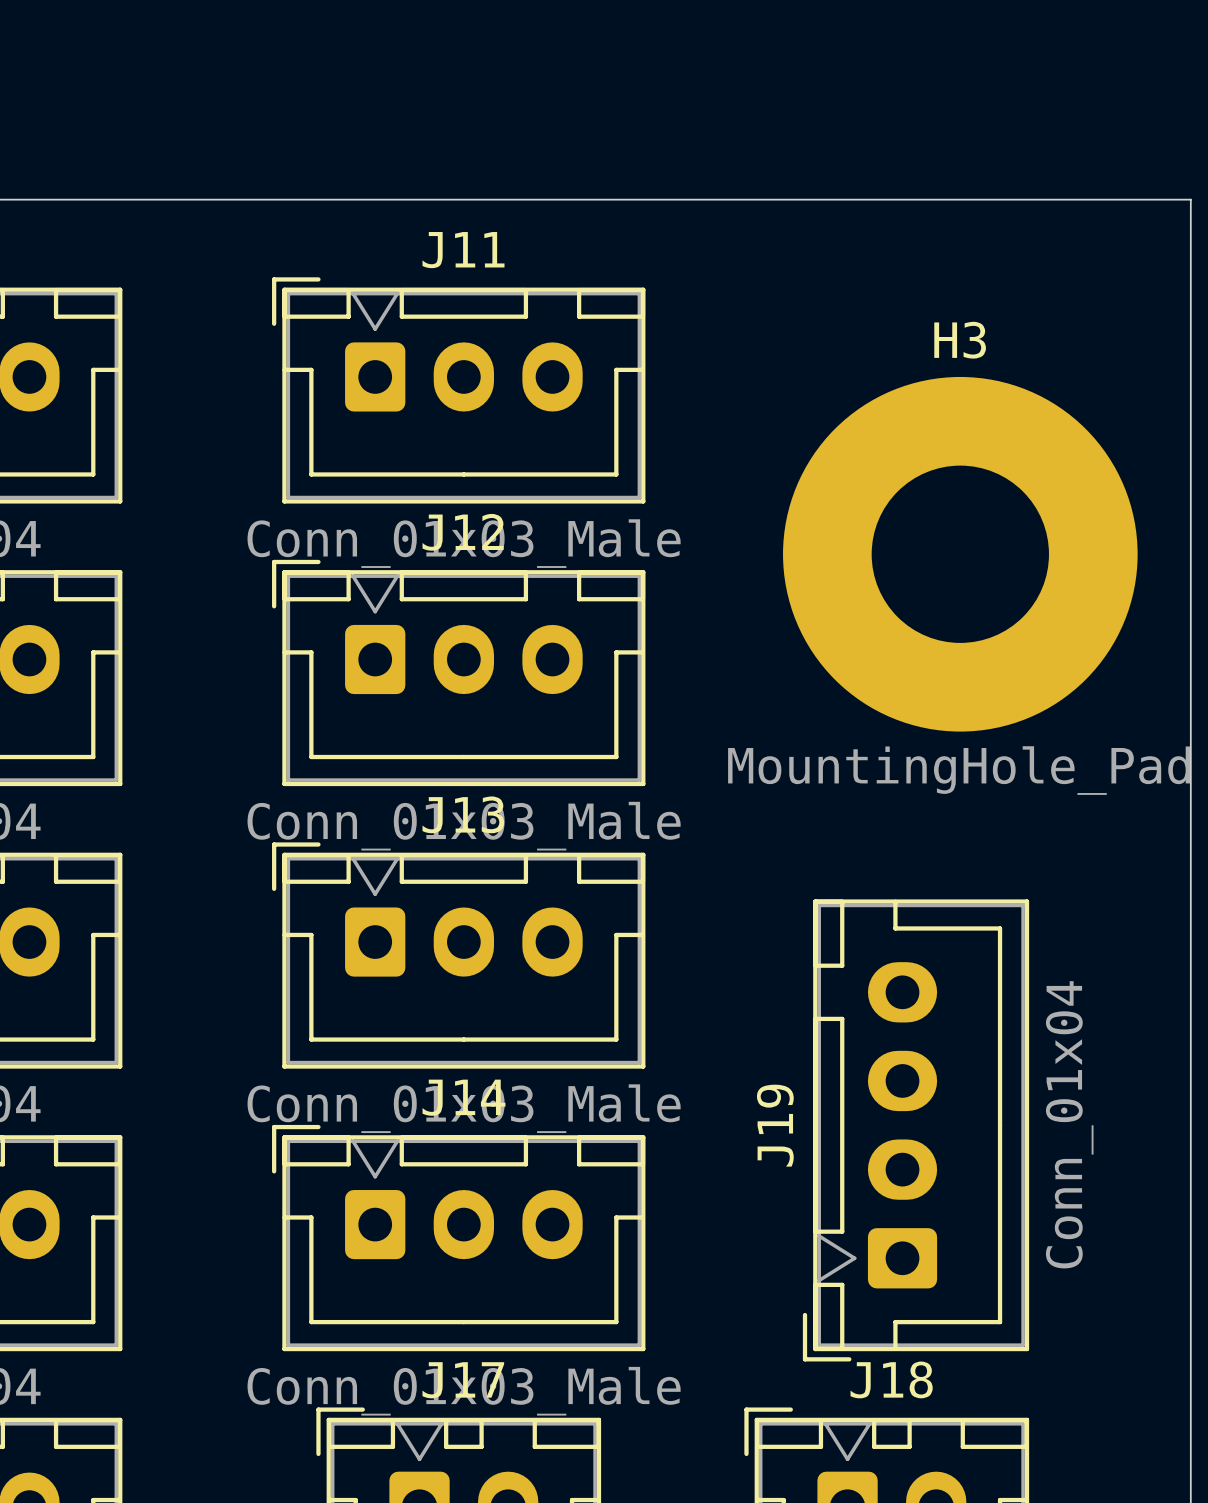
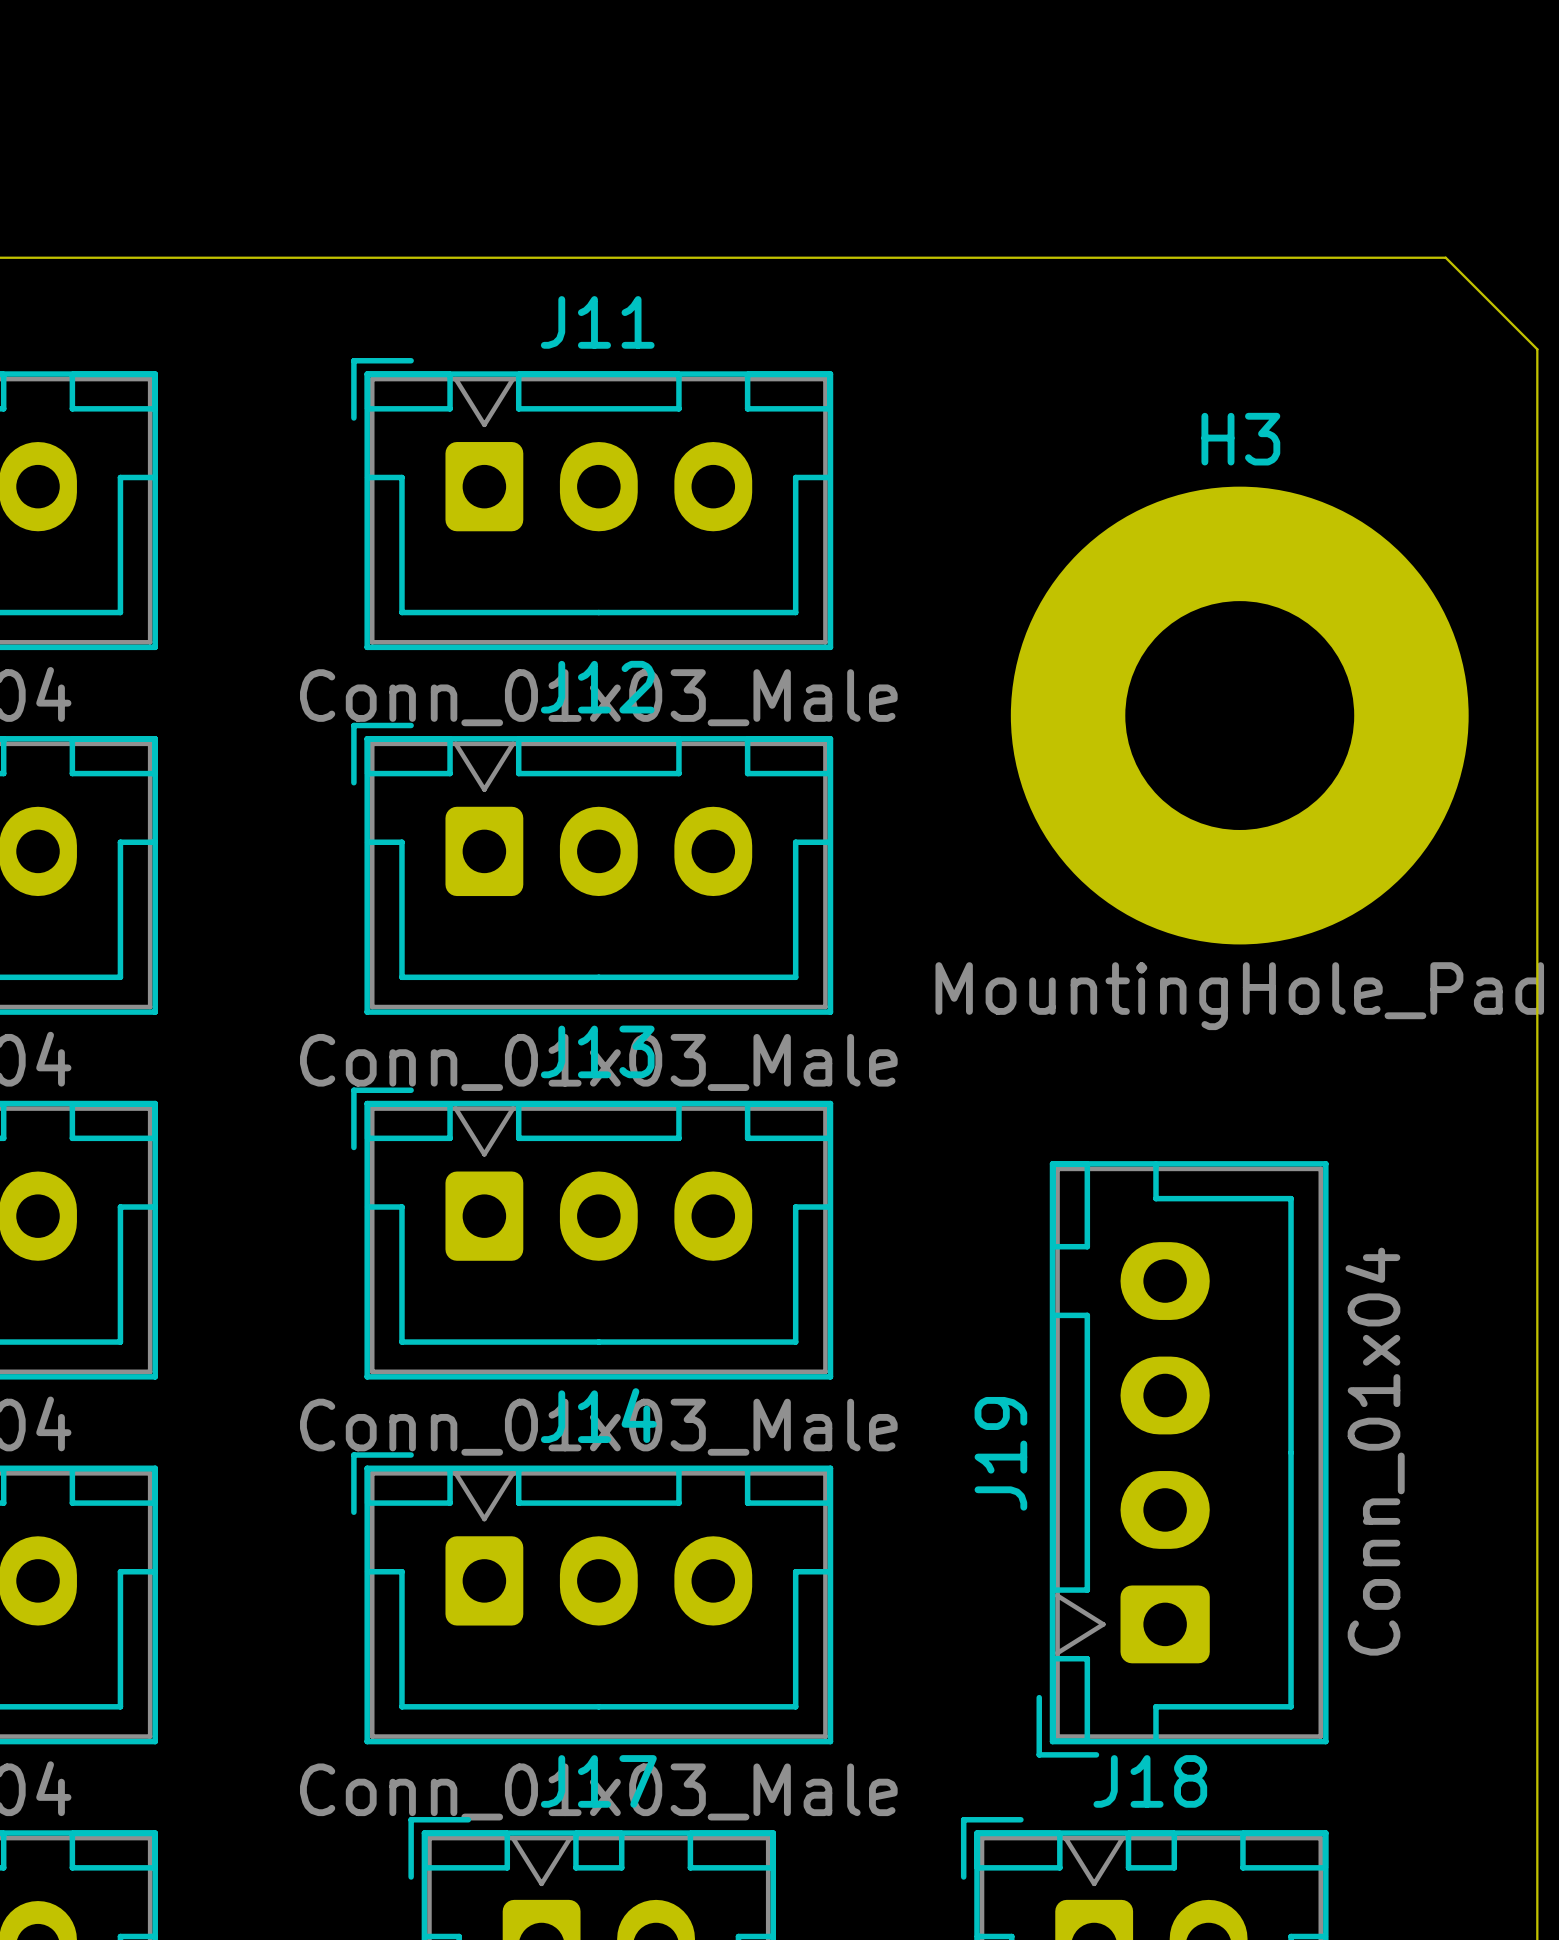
board edge: (1119, 199) (1190, 199) (1190, 270) -> (1445, 257) (1537, 349)

